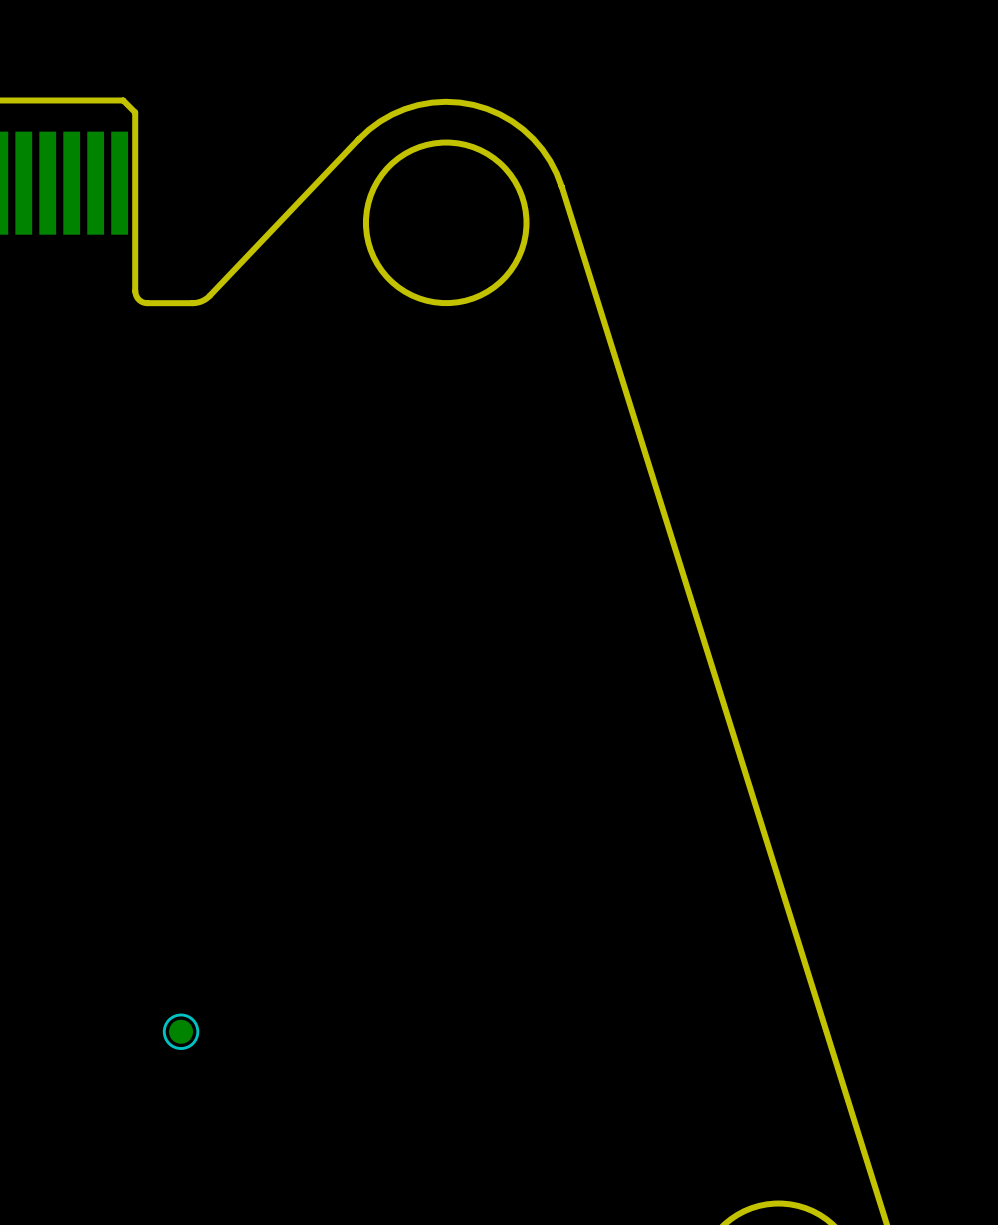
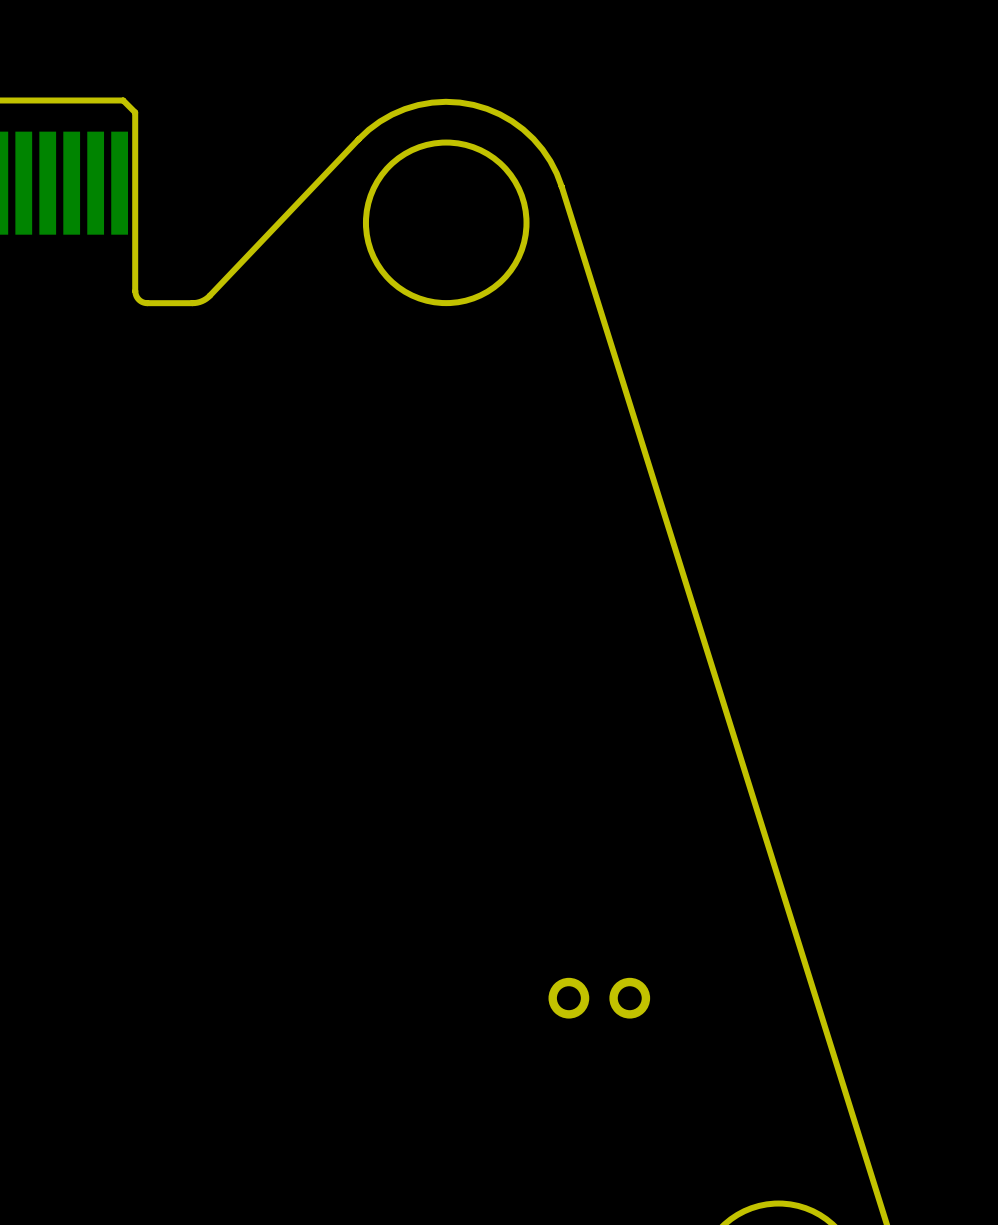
part: none -> (599, 998)
part: (181, 1031) -> none

